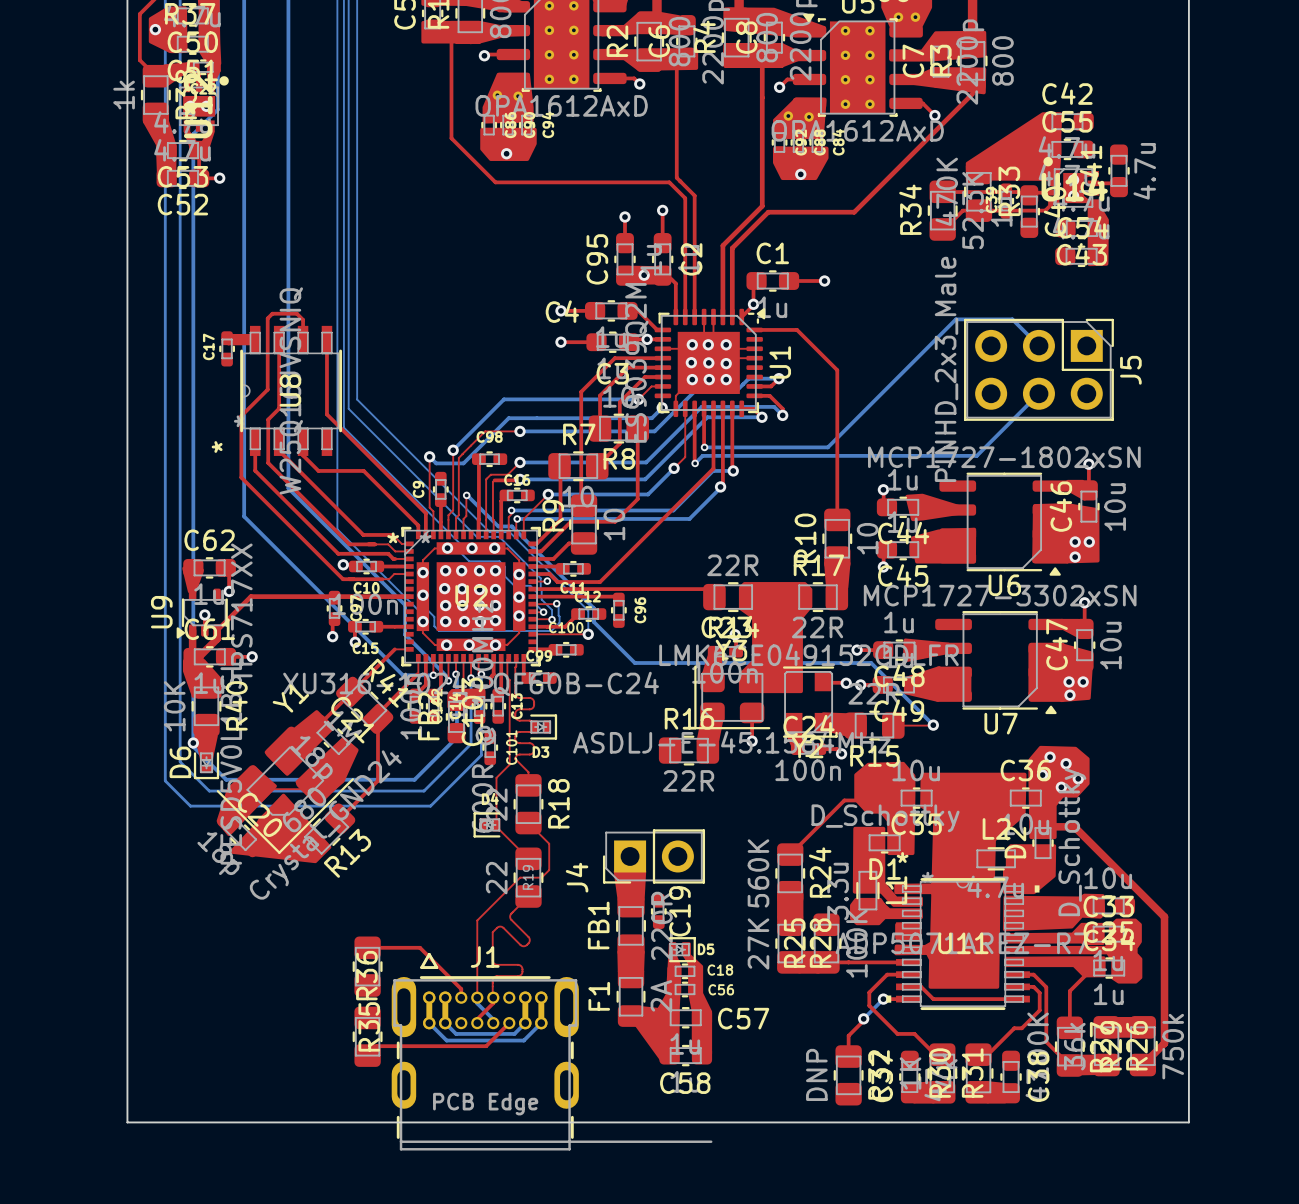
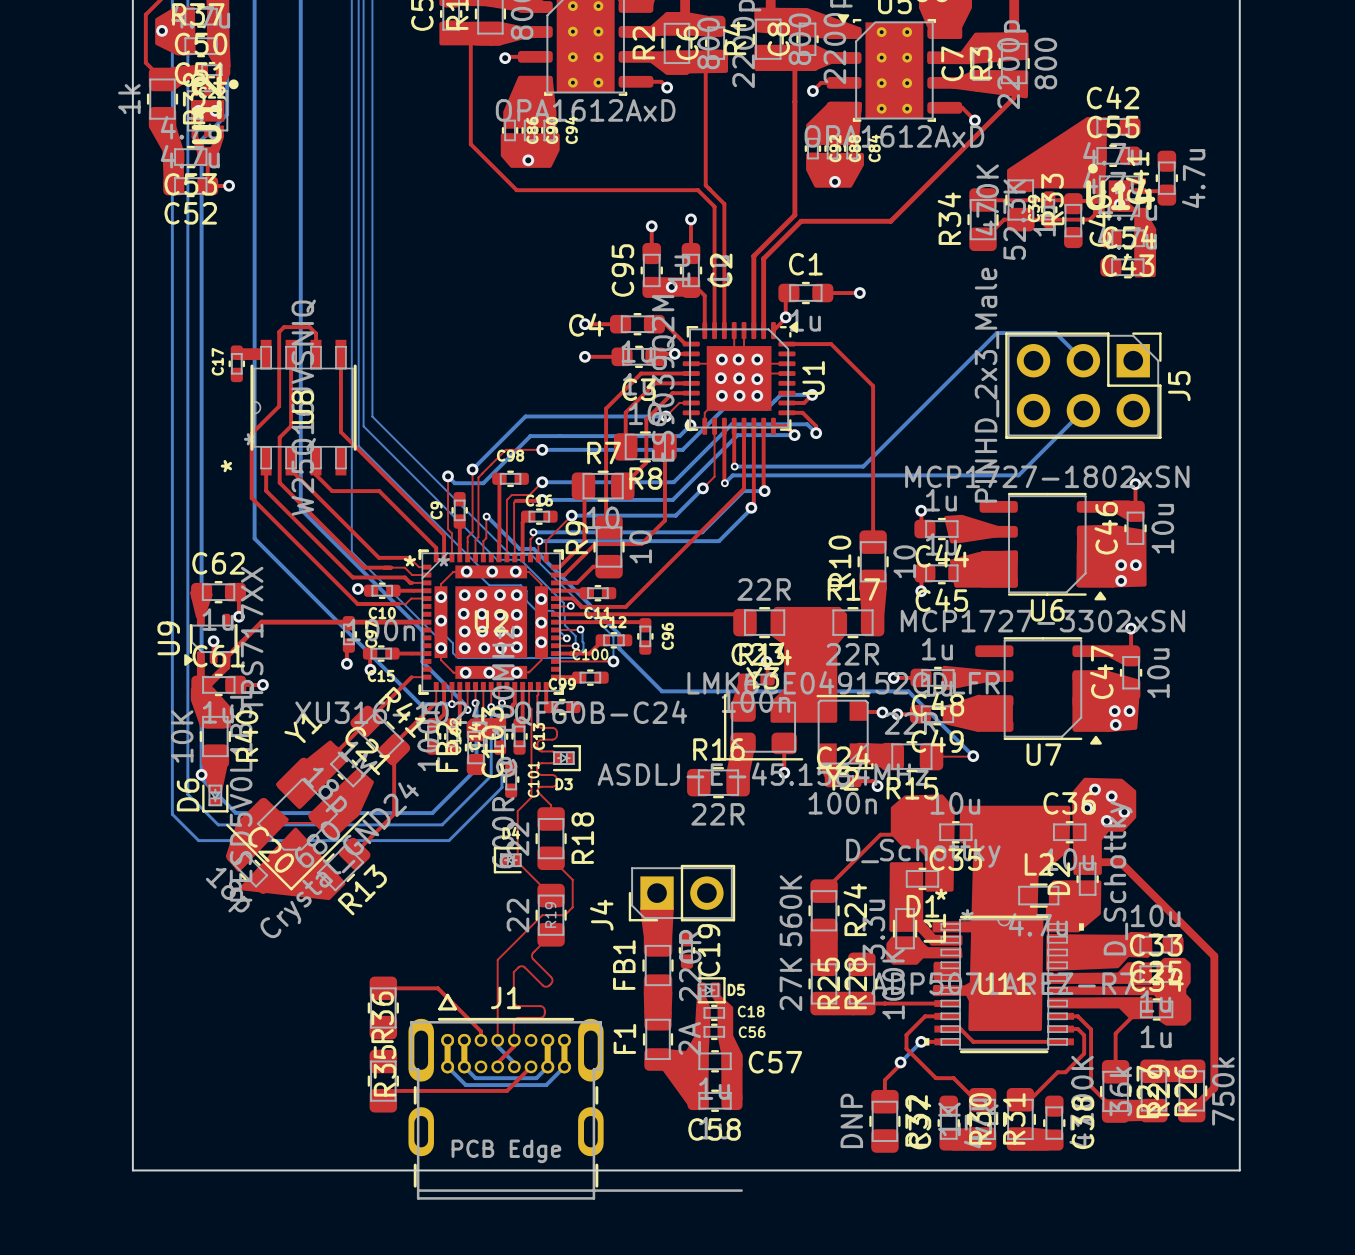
part: (898, 17) -> none
part: (915, 17) -> none
part: (497, 95) -> none
part: (518, 96) -> none
part: (788, 116) -> none
part: (809, 116) -> none

